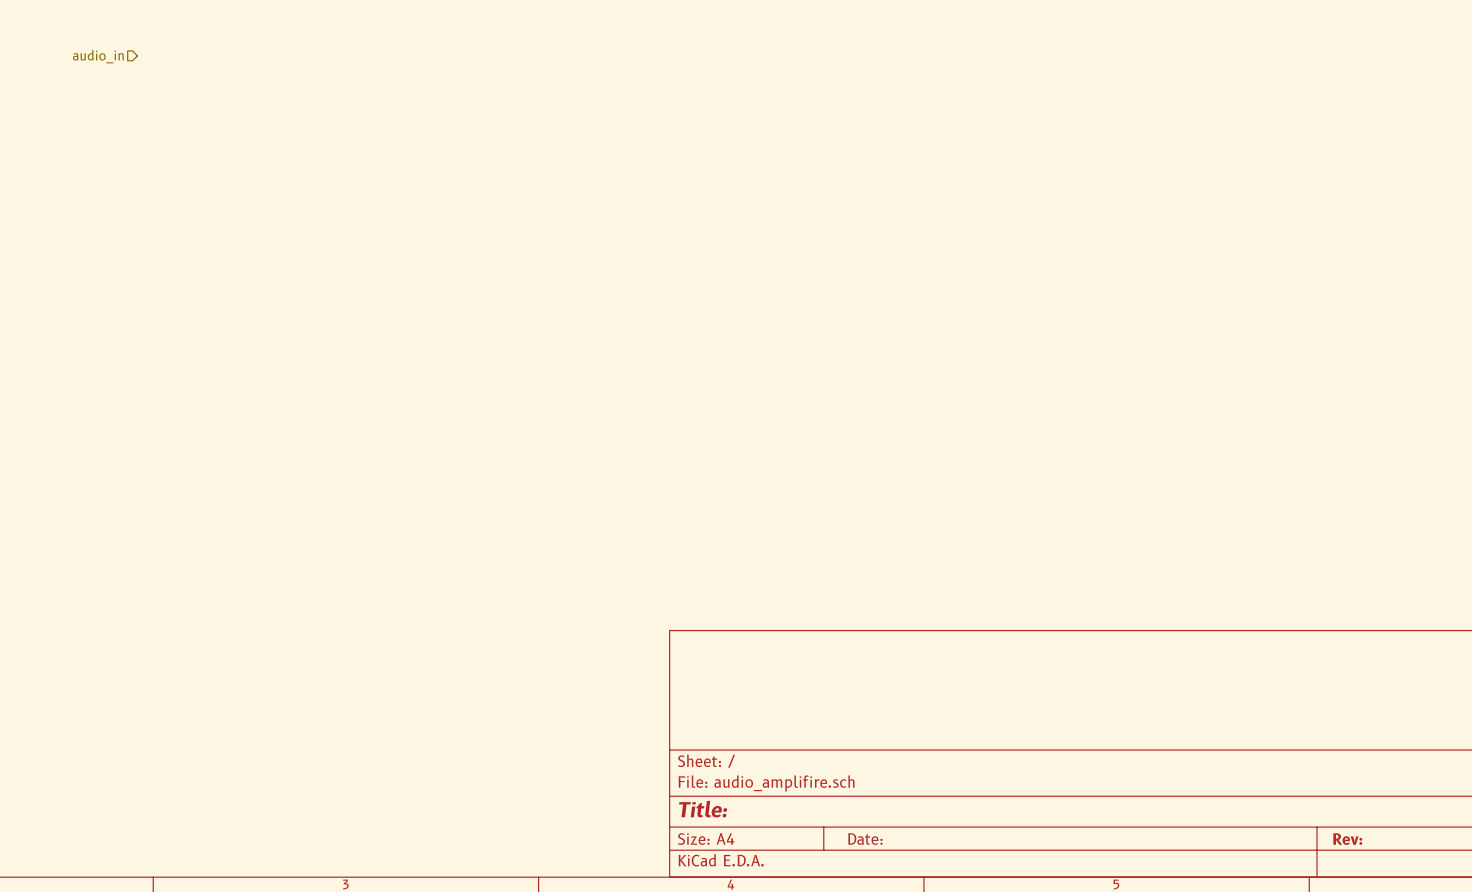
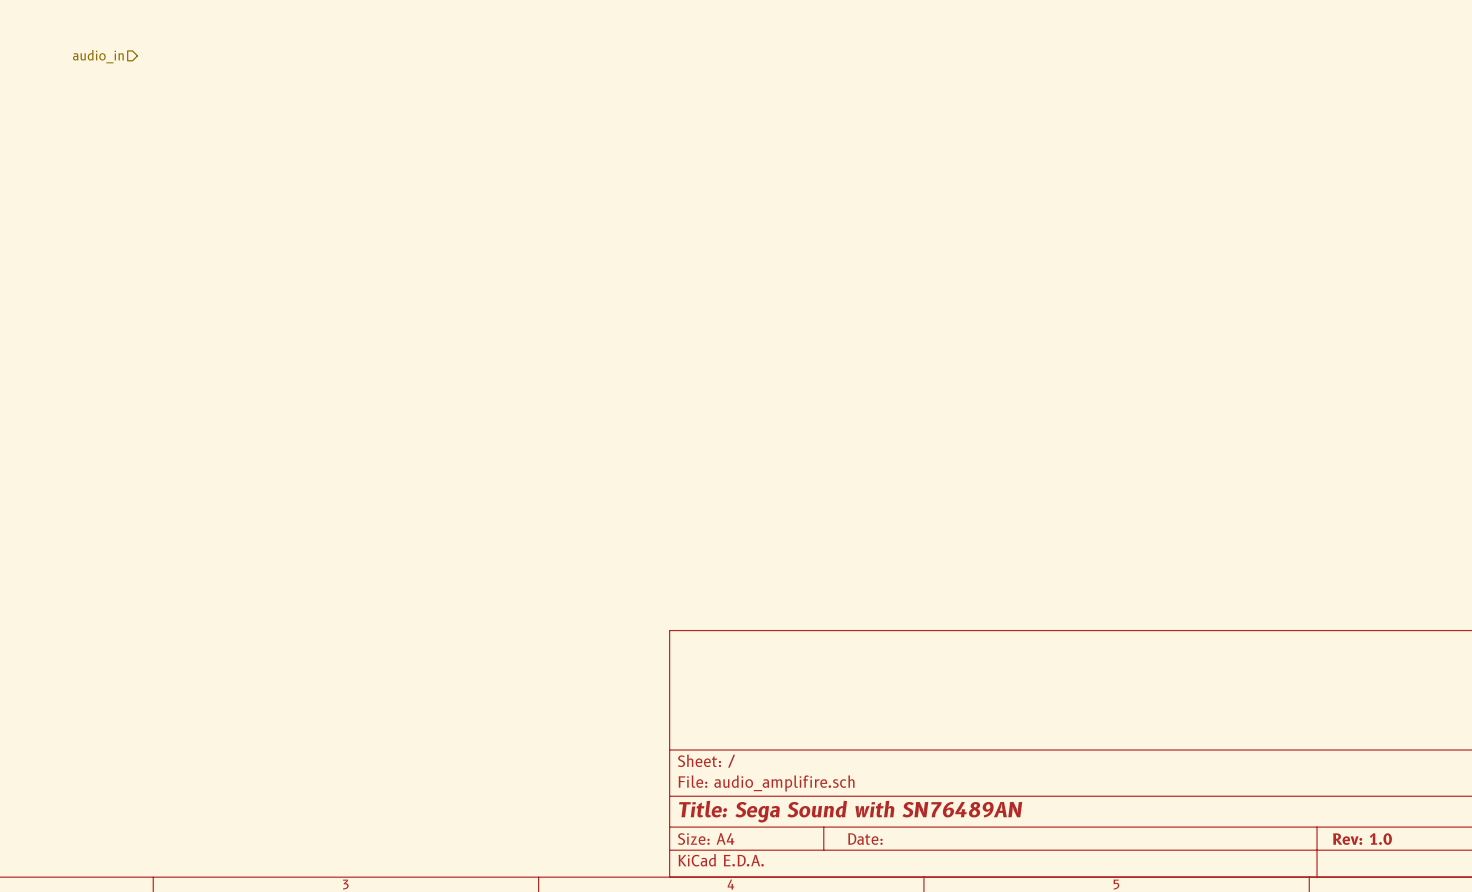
title block: Title: (703, 809) -> Title: Sega Sound with SN76489AN (850, 811)
title block: Rev: (1347, 839) -> Rev: 1.0 (1362, 839)

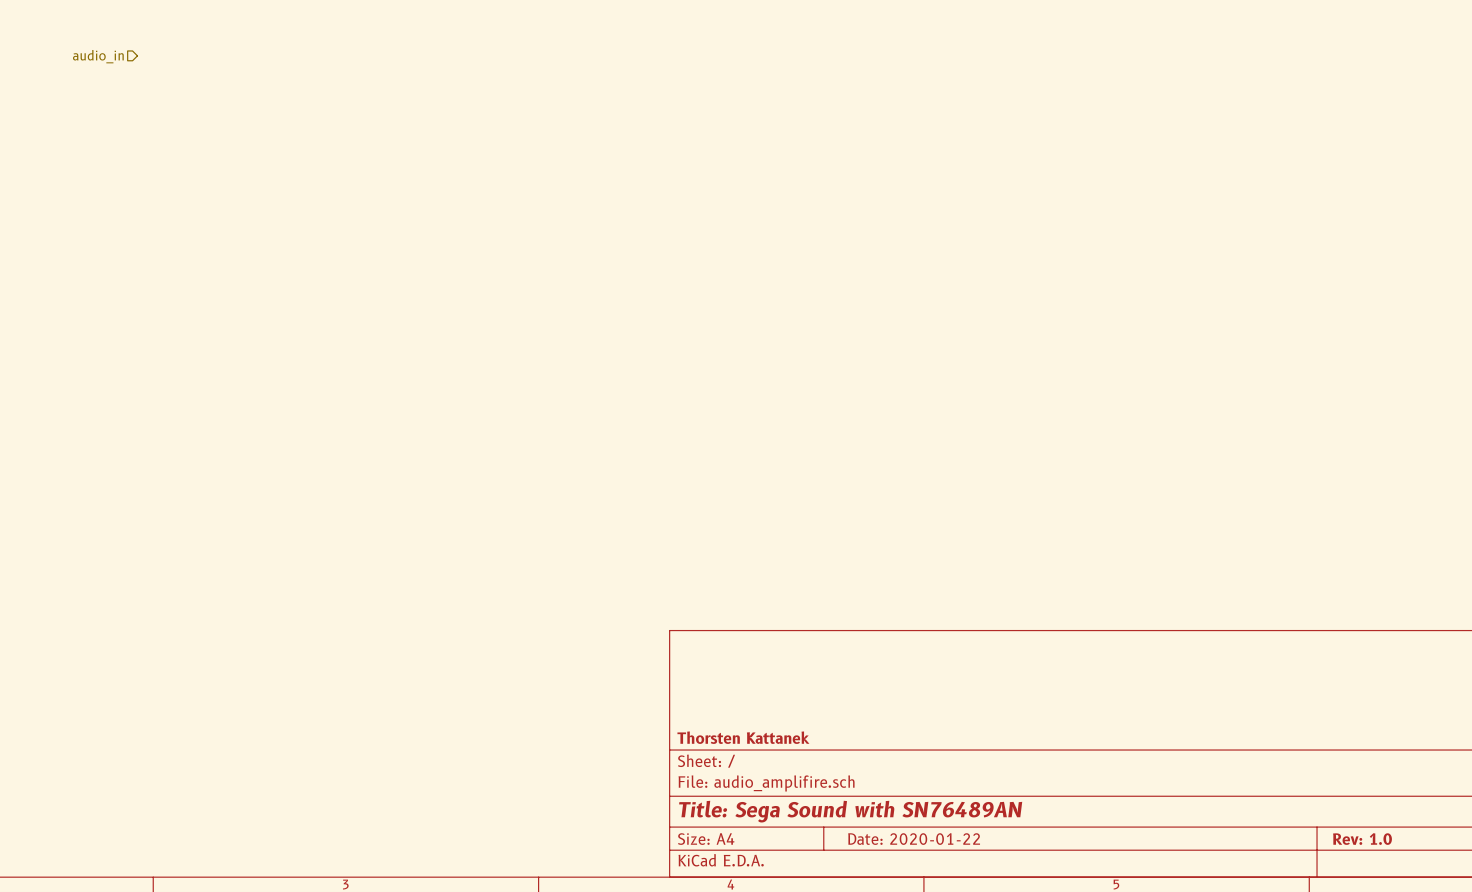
title block: none -> Thorsten Kattanek (743, 737)
title block: Date: (865, 839) -> Date: 2020-01-22 (914, 839)

